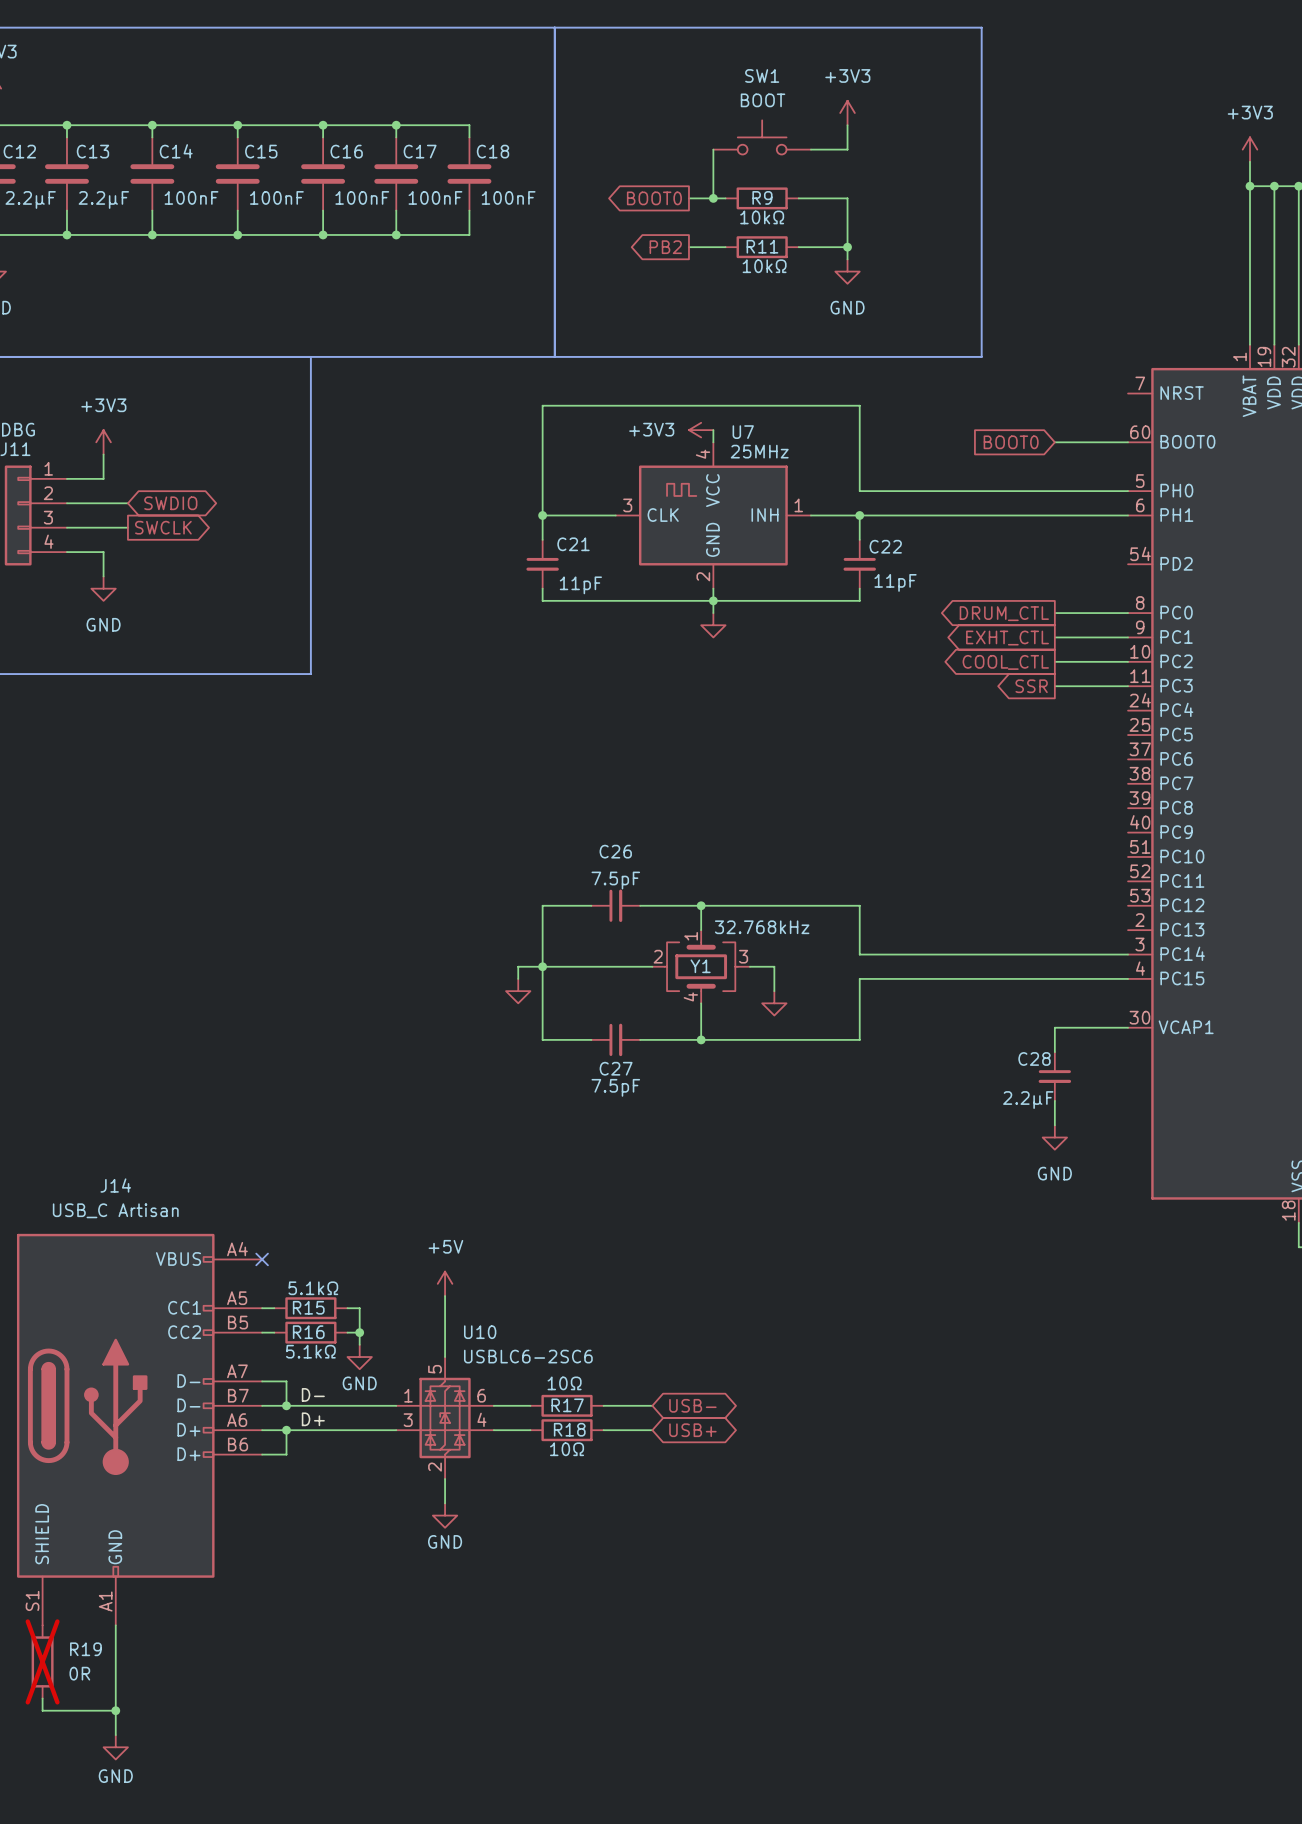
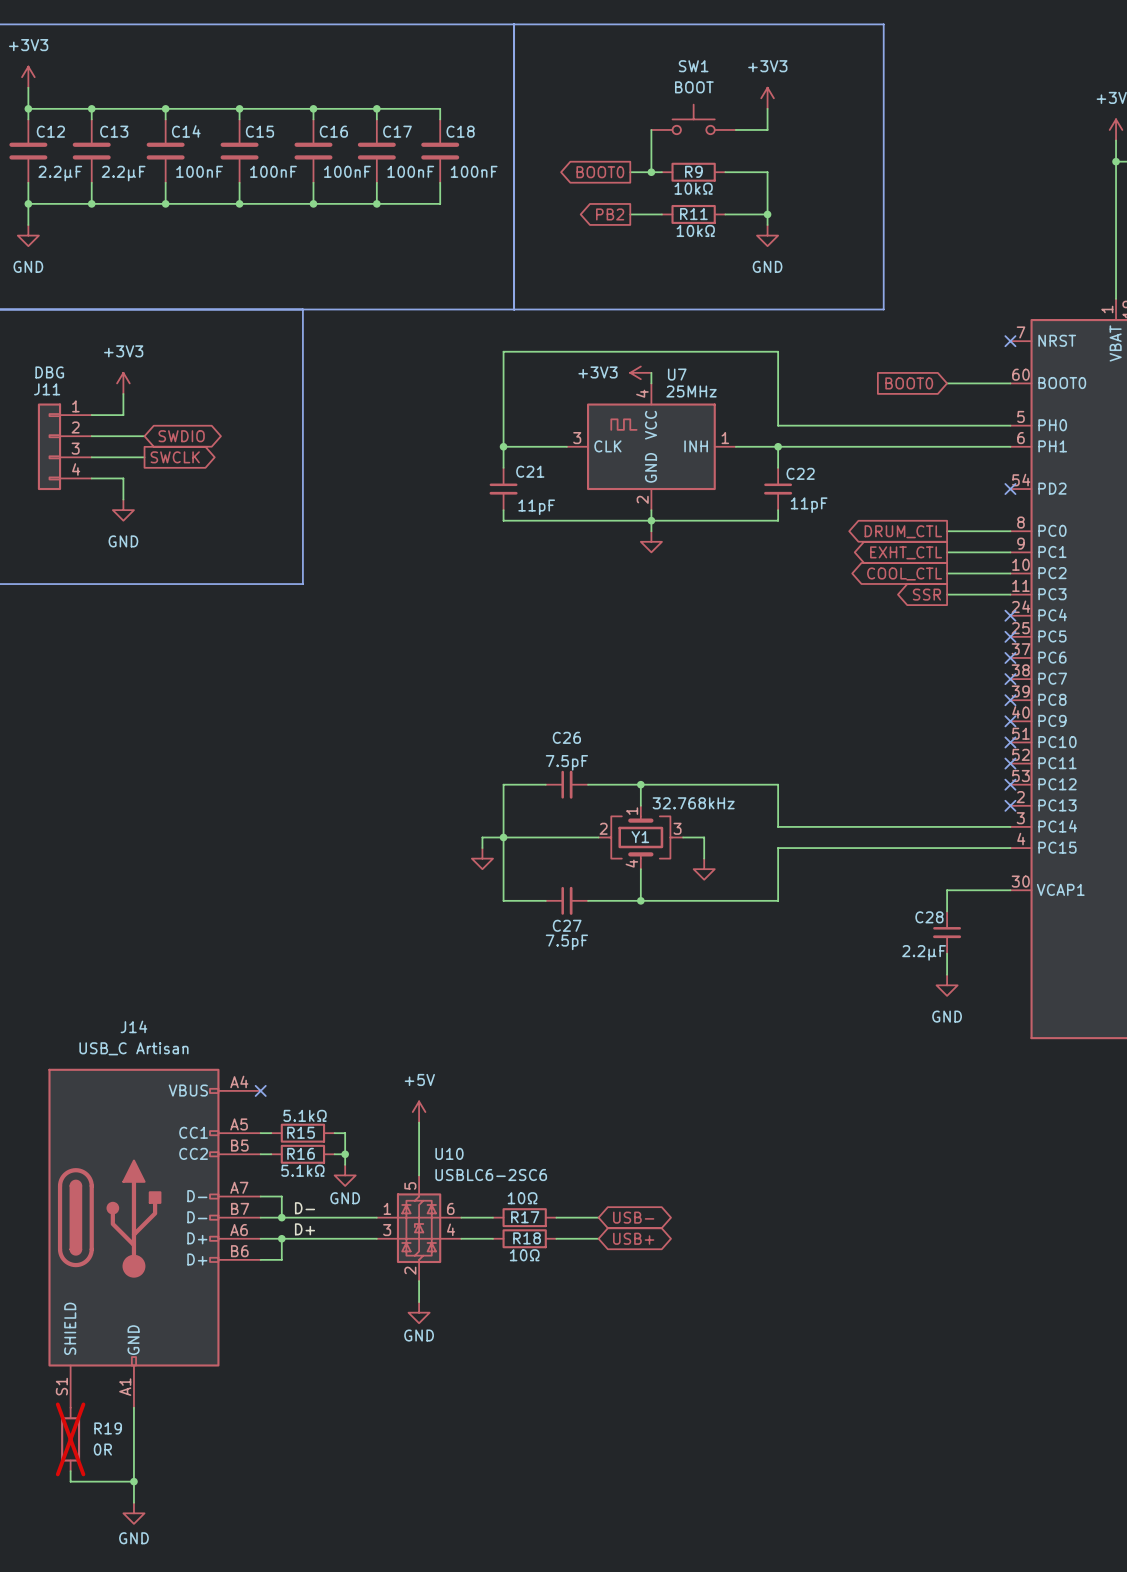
no-connect mark: none -> (1010, 341)
no-connect mark: none -> (1010, 489)
no-connect mark: none -> (1010, 615)
no-connect mark: none -> (1010, 636)
no-connect mark: none -> (1010, 657)
no-connect mark: none -> (1010, 679)
no-connect mark: none -> (1010, 700)
no-connect mark: none -> (1010, 721)
no-connect mark: none -> (1010, 742)
no-connect mark: none -> (1010, 763)
no-connect mark: none -> (1010, 784)
no-connect mark: none -> (1010, 805)

